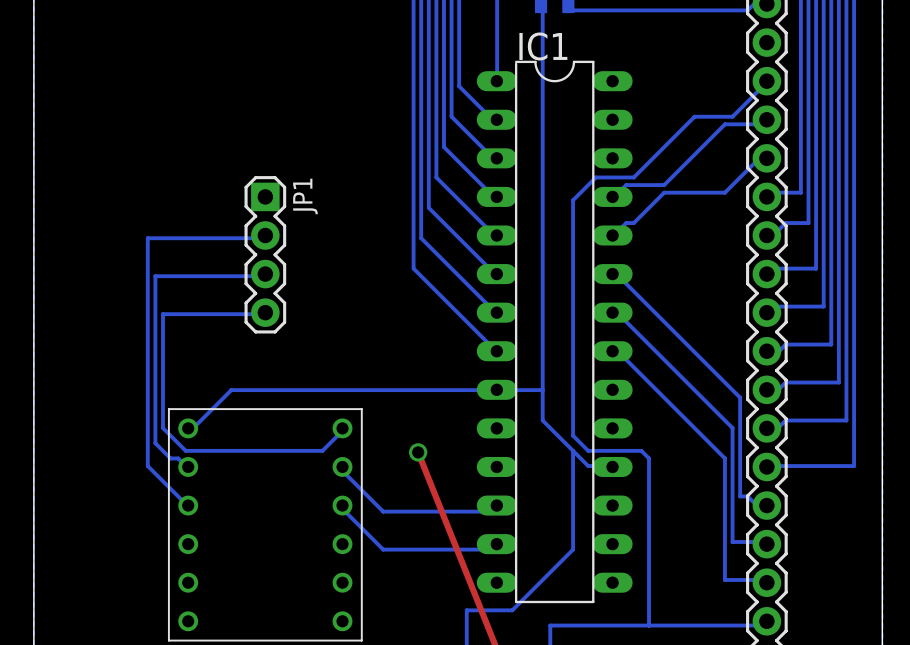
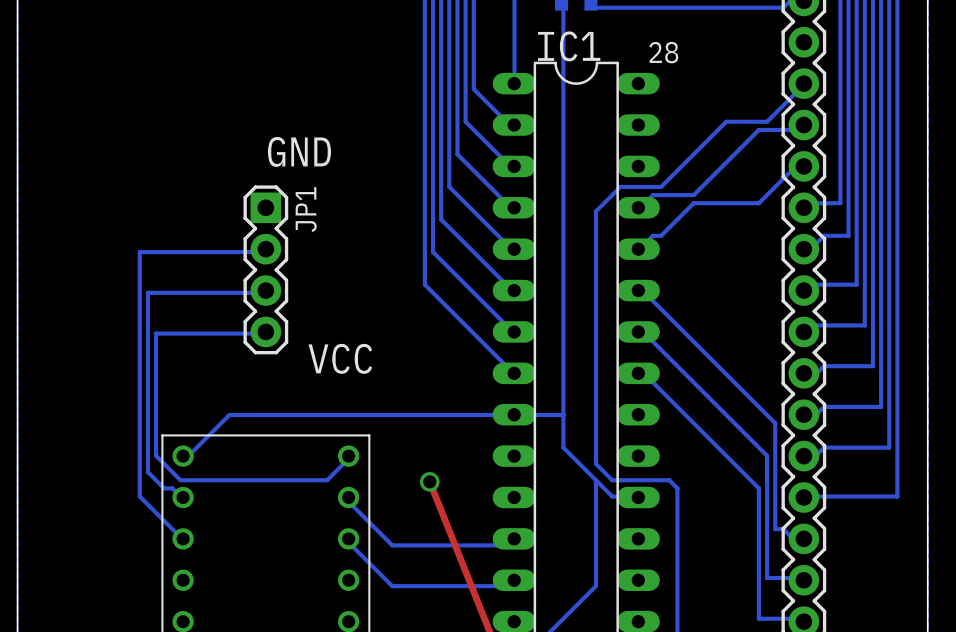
text: none -> 28 (663, 52)
text: none -> GND (299, 151)
text: none -> VCC (340, 358)

